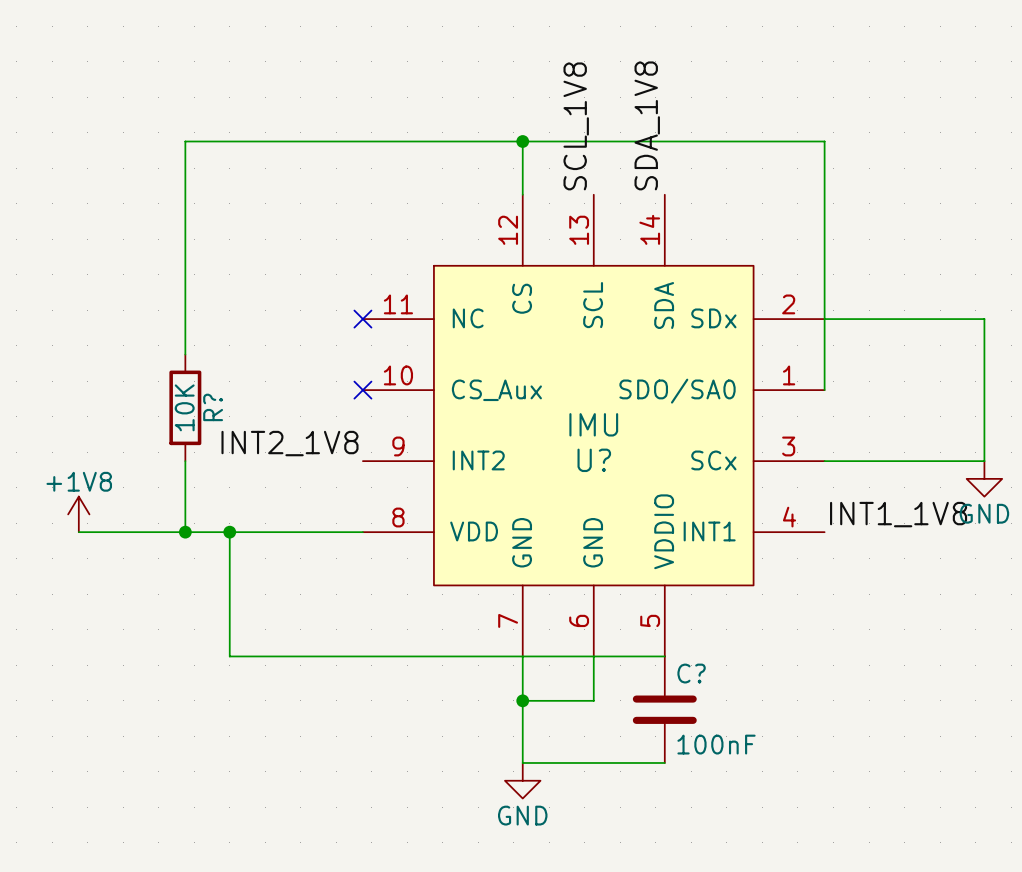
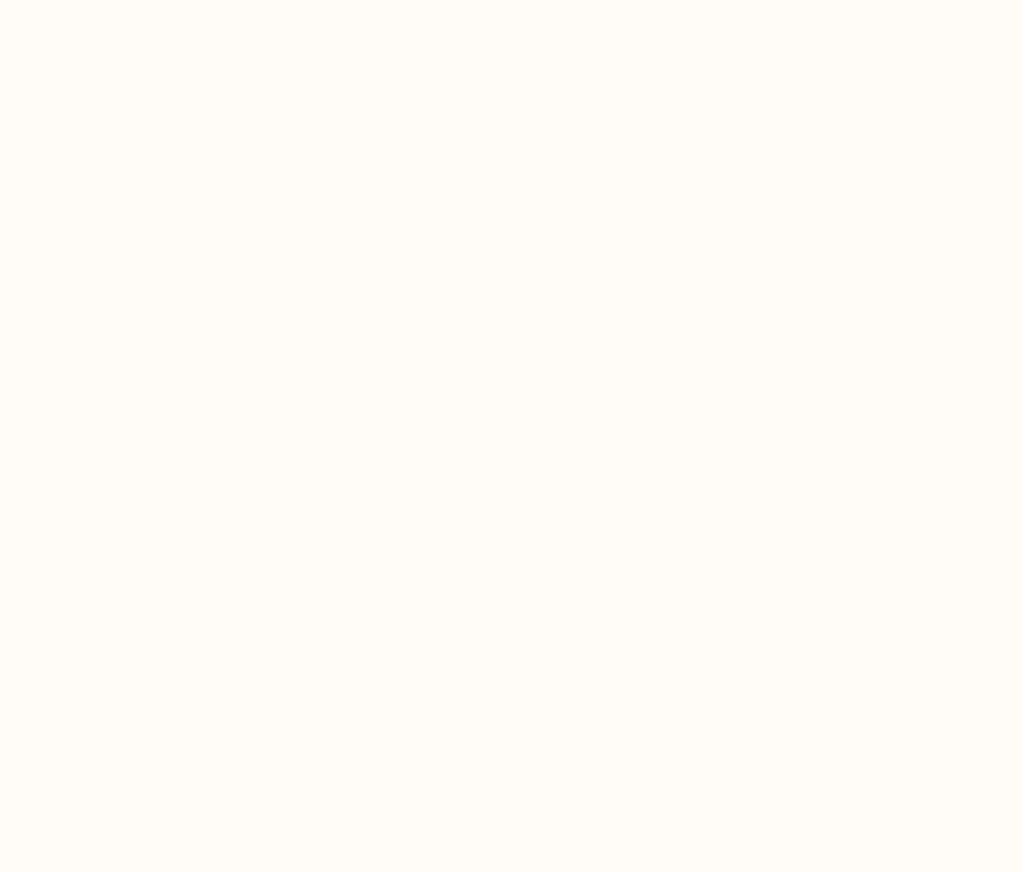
label: SDA_1V8 (647, 125) -> none
label: SCL_1V8 (576, 126) -> none
wire: (522, 141) (522, 194) -> none
junction: (522, 141) -> none
no-connect mark: (362, 319) -> none
wire: (824, 319) (984, 319) (984, 461) (824, 461) -> none
wire: (185, 354) (185, 141) (824, 141) (824, 390) -> none
no-connect mark: (362, 390) -> none
R?: 10K (185, 407) -> none
U?: IMU (593, 425) -> none
label: INT2_1V8 (289, 443) -> none
wire: (185, 461) (185, 532) -> none
power symbol: GND (984, 478) -> none
power symbol: +1V8 (78, 514) -> none
label: INT1_1V8 (898, 514) -> none
wire: (78, 532) (362, 532) -> none
junction: (185, 532) -> none
wire: (229, 532) (229, 656) (664, 656) -> none
junction: (229, 532) -> none
wire: (522, 656) (522, 762) (664, 762) -> none
wire: (593, 656) (593, 700) (522, 700) -> none
junction: (522, 700) -> none
C?: 100nF (664, 709) -> none
power symbol: GND (522, 780) -> none

